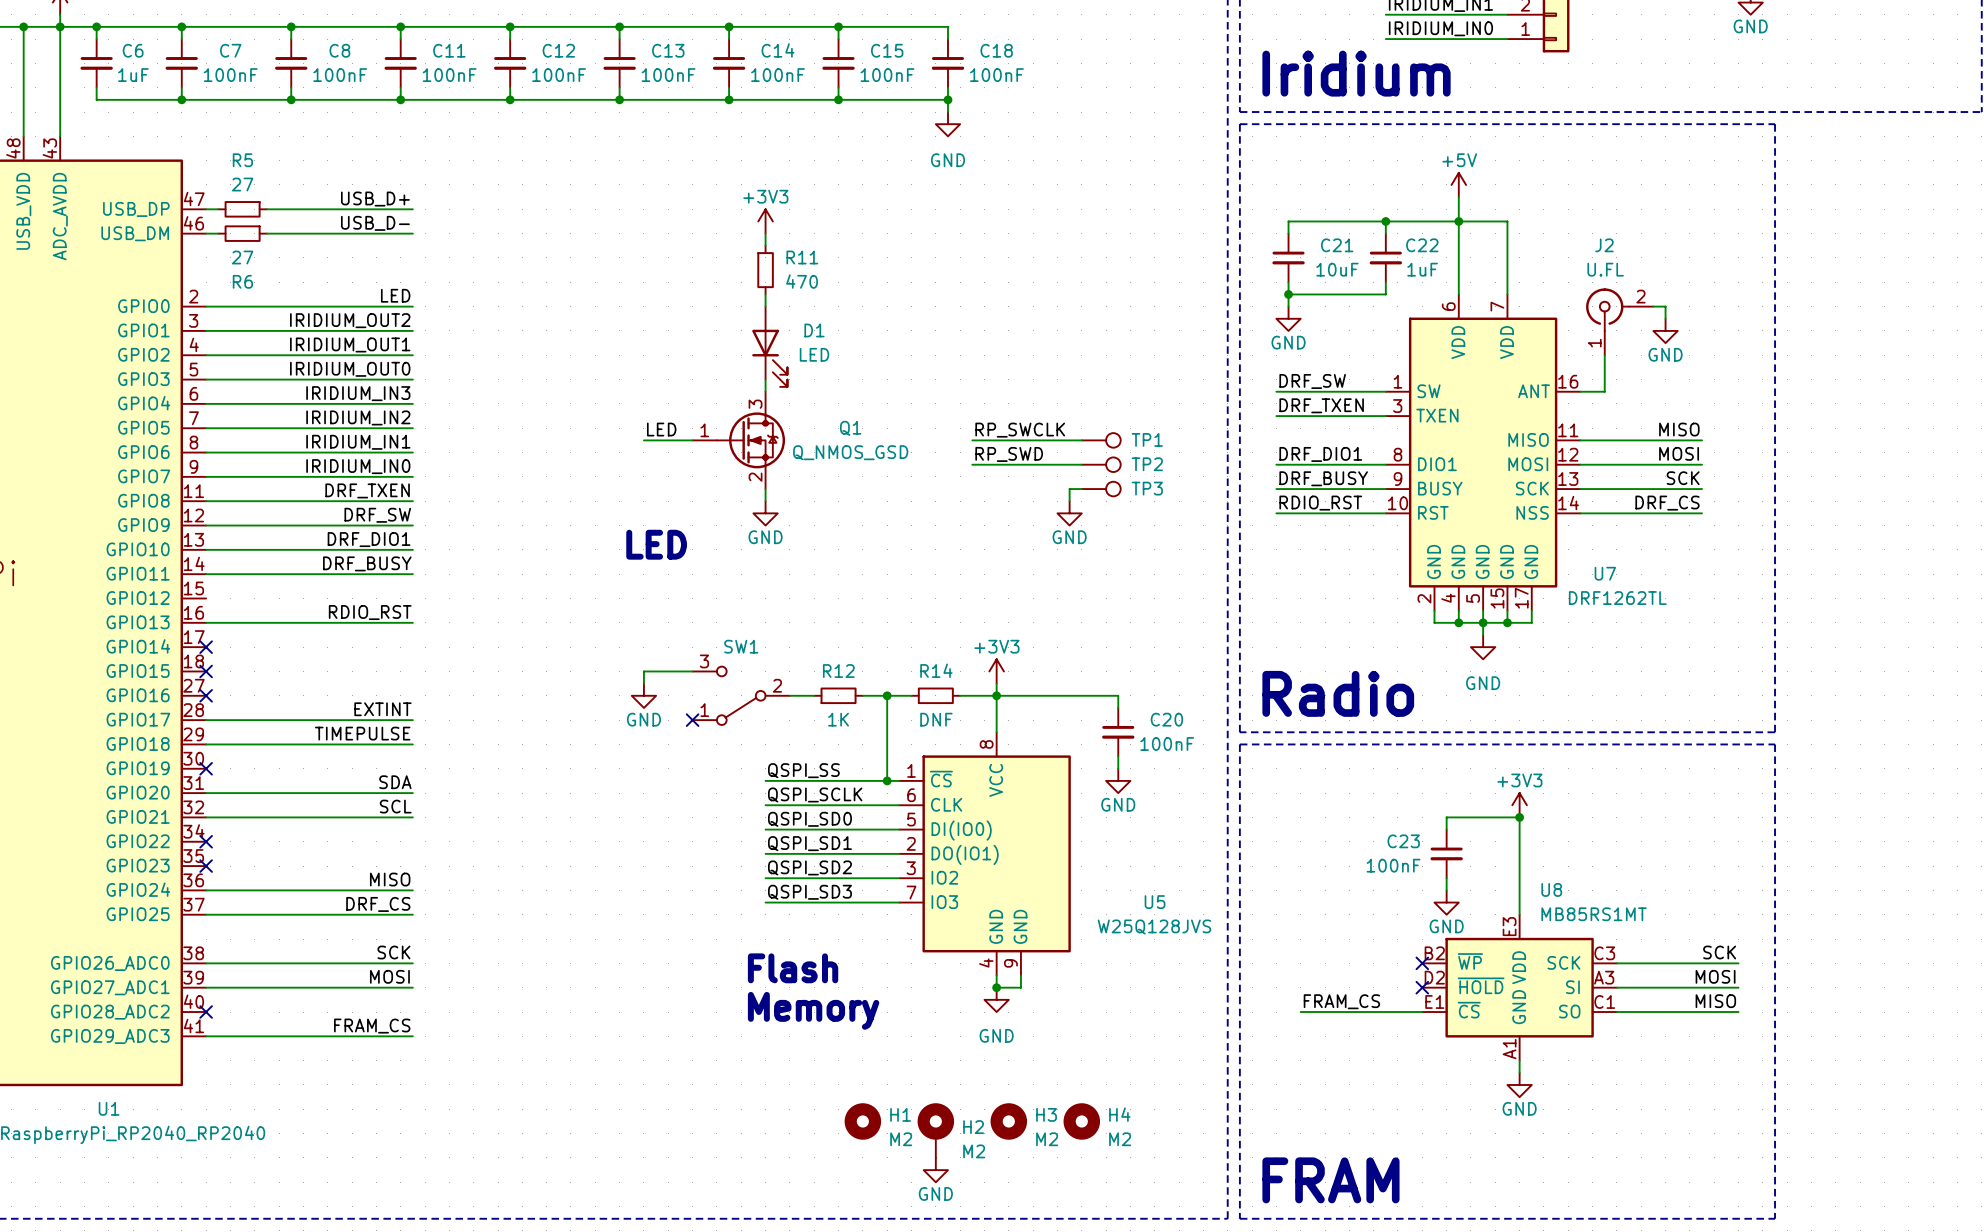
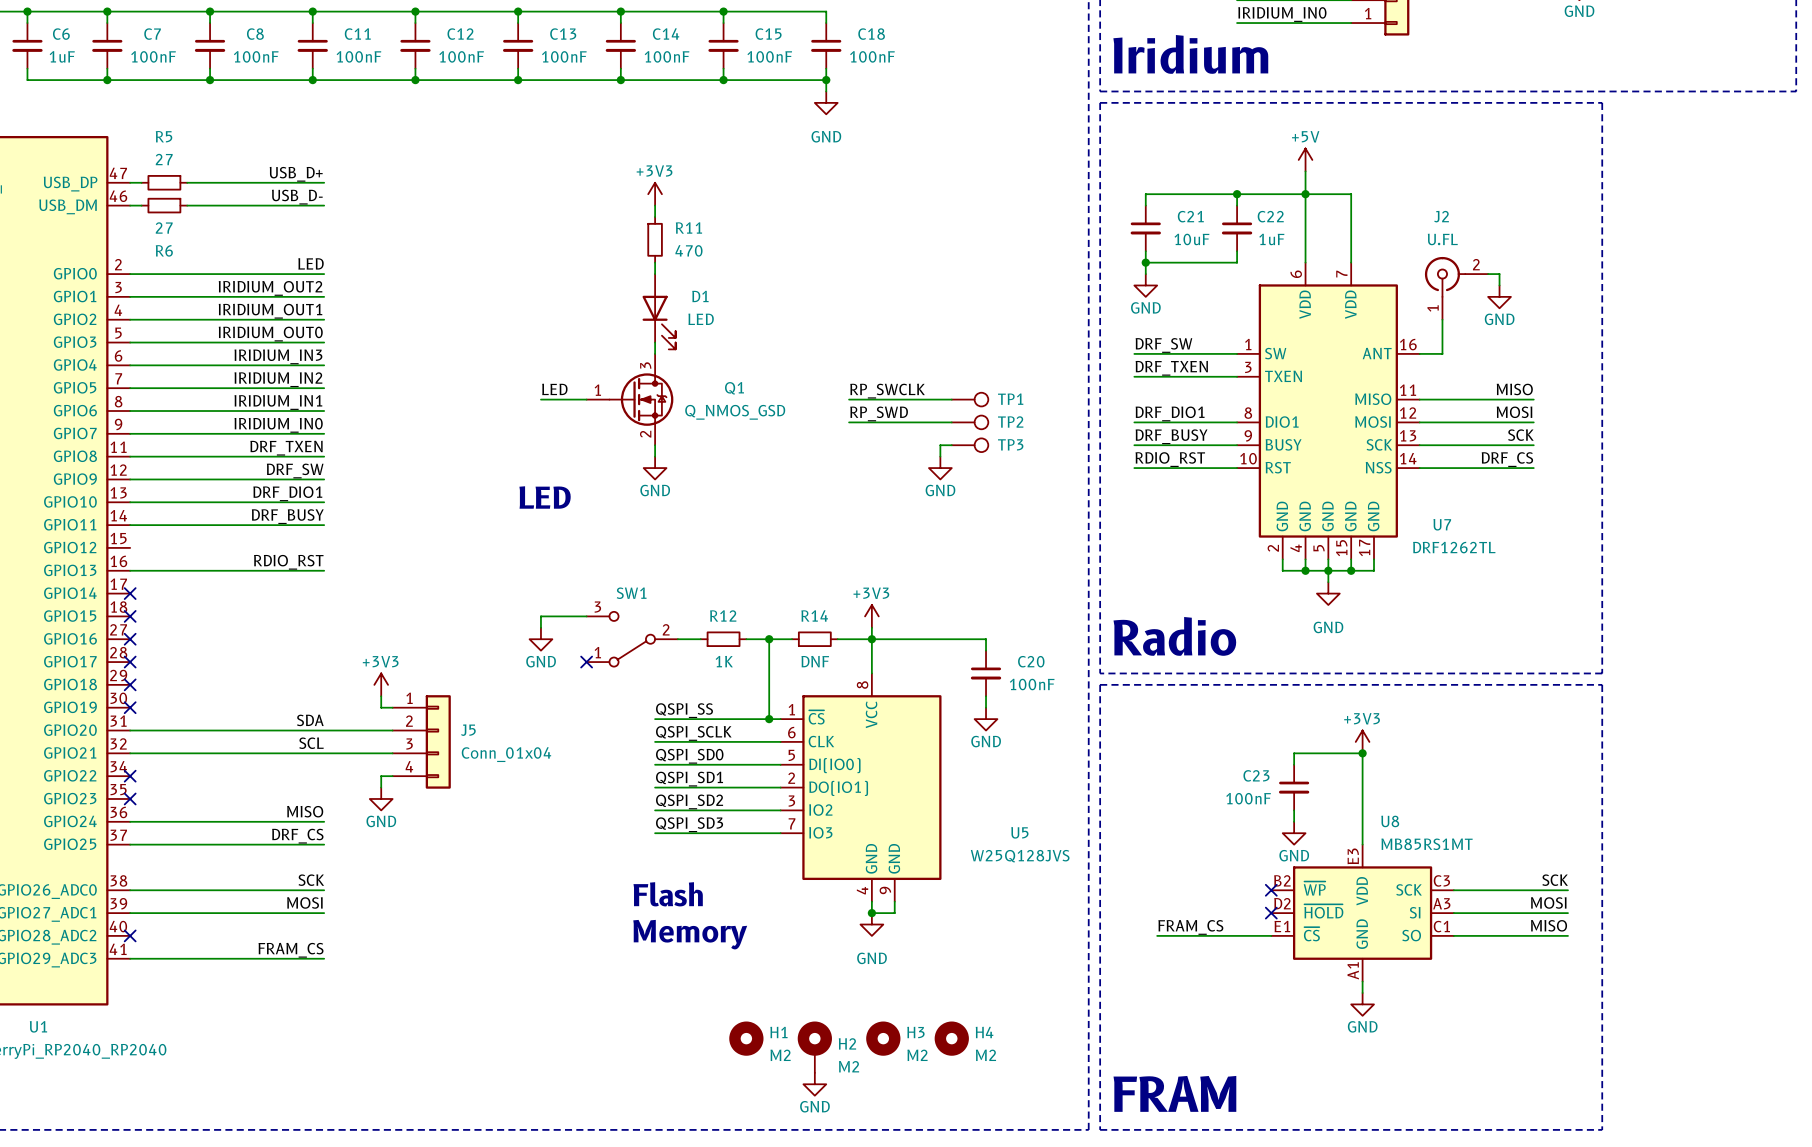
label: EXTINT (382, 709) -> none
wire: (206, 720) (412, 720) -> none
no-connect mark: none -> (130, 662)
label: TIMEPULSE (362, 733) -> none
wire: (206, 744) (412, 744) -> none
no-connect mark: none -> (130, 684)
power symbol: none -> +3V3 (381, 684)
wire: none -> (381, 696) (381, 707) (392, 707)
wire: none -> (324, 730) (392, 730)
J5: none -> Conn_01x04 (421, 741)
wire: none -> (324, 753) (392, 753)
wire: none -> (392, 776) (381, 776) (381, 787)
power symbol: none -> GND (381, 798)

